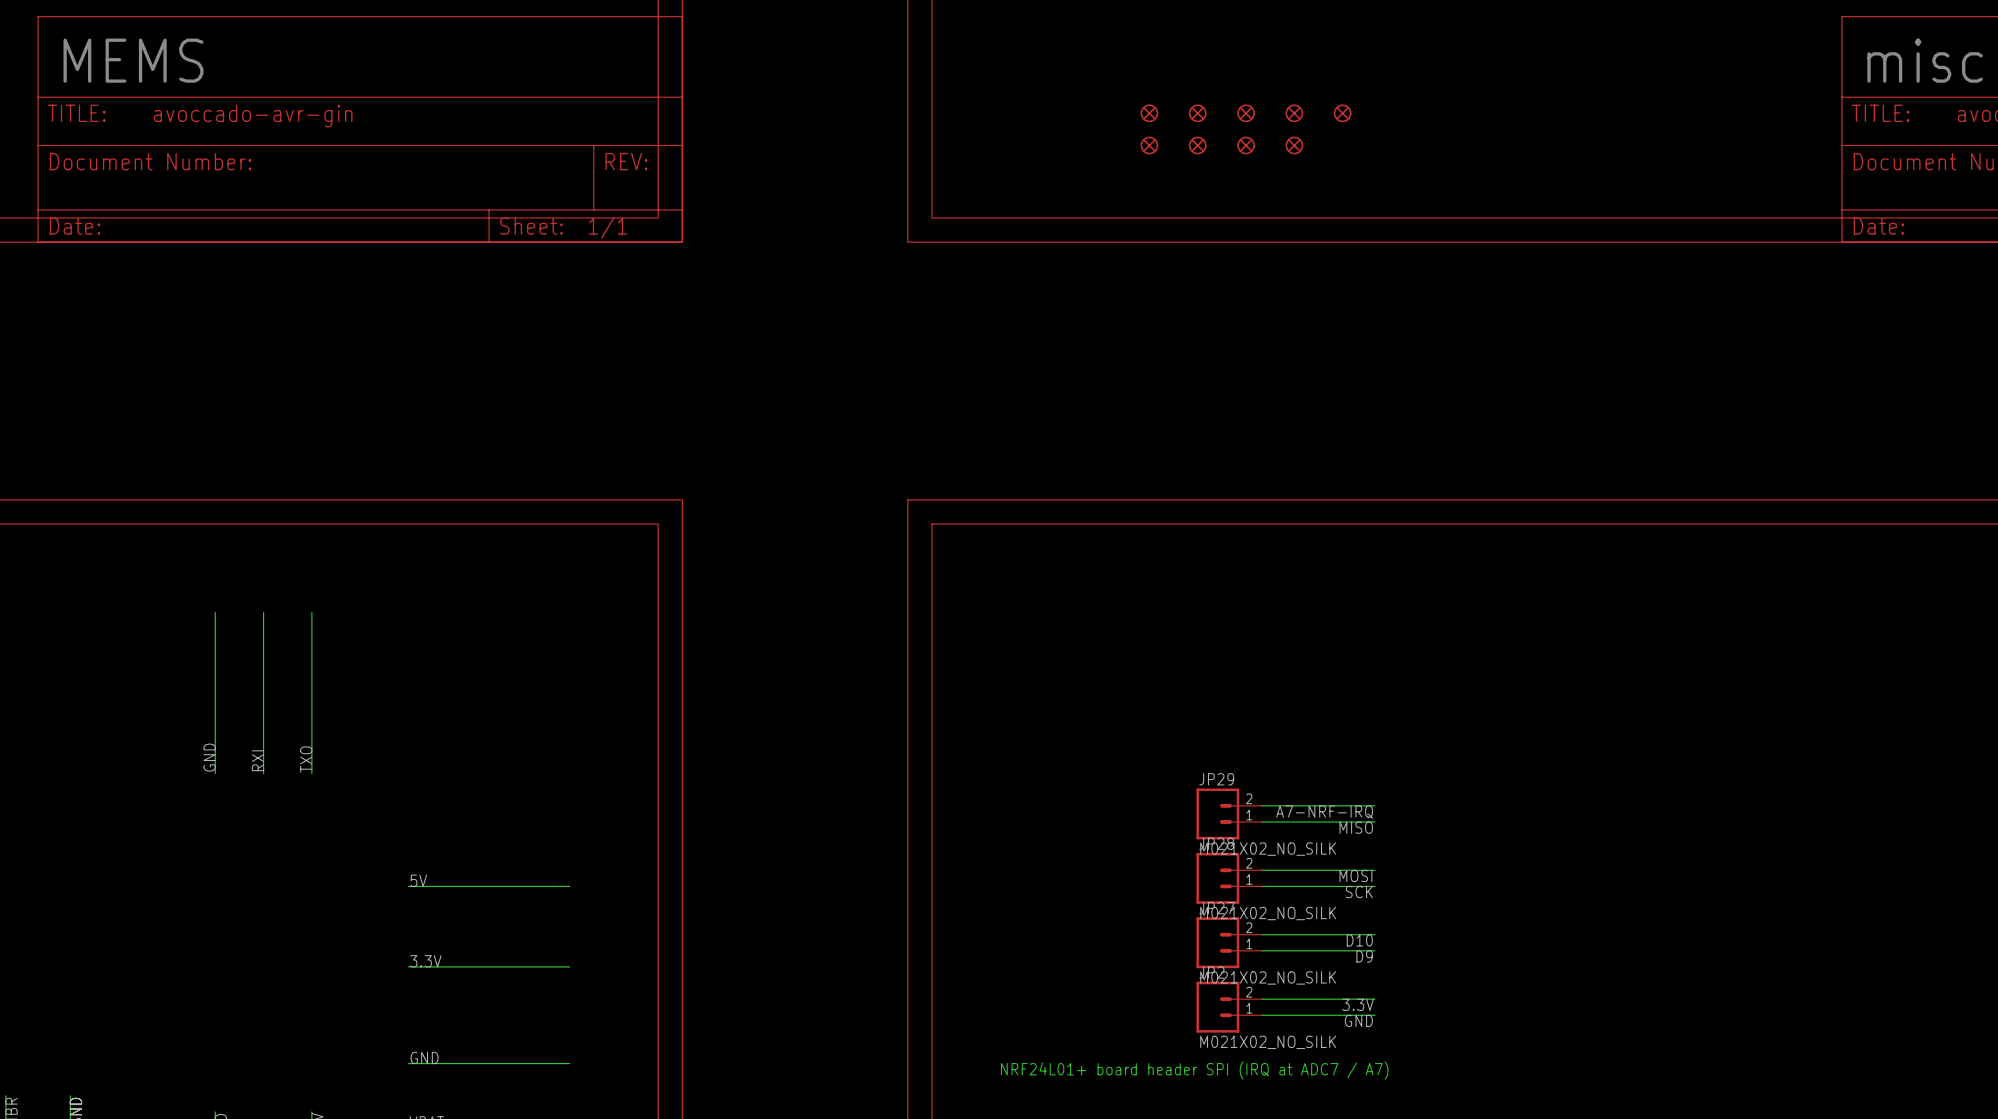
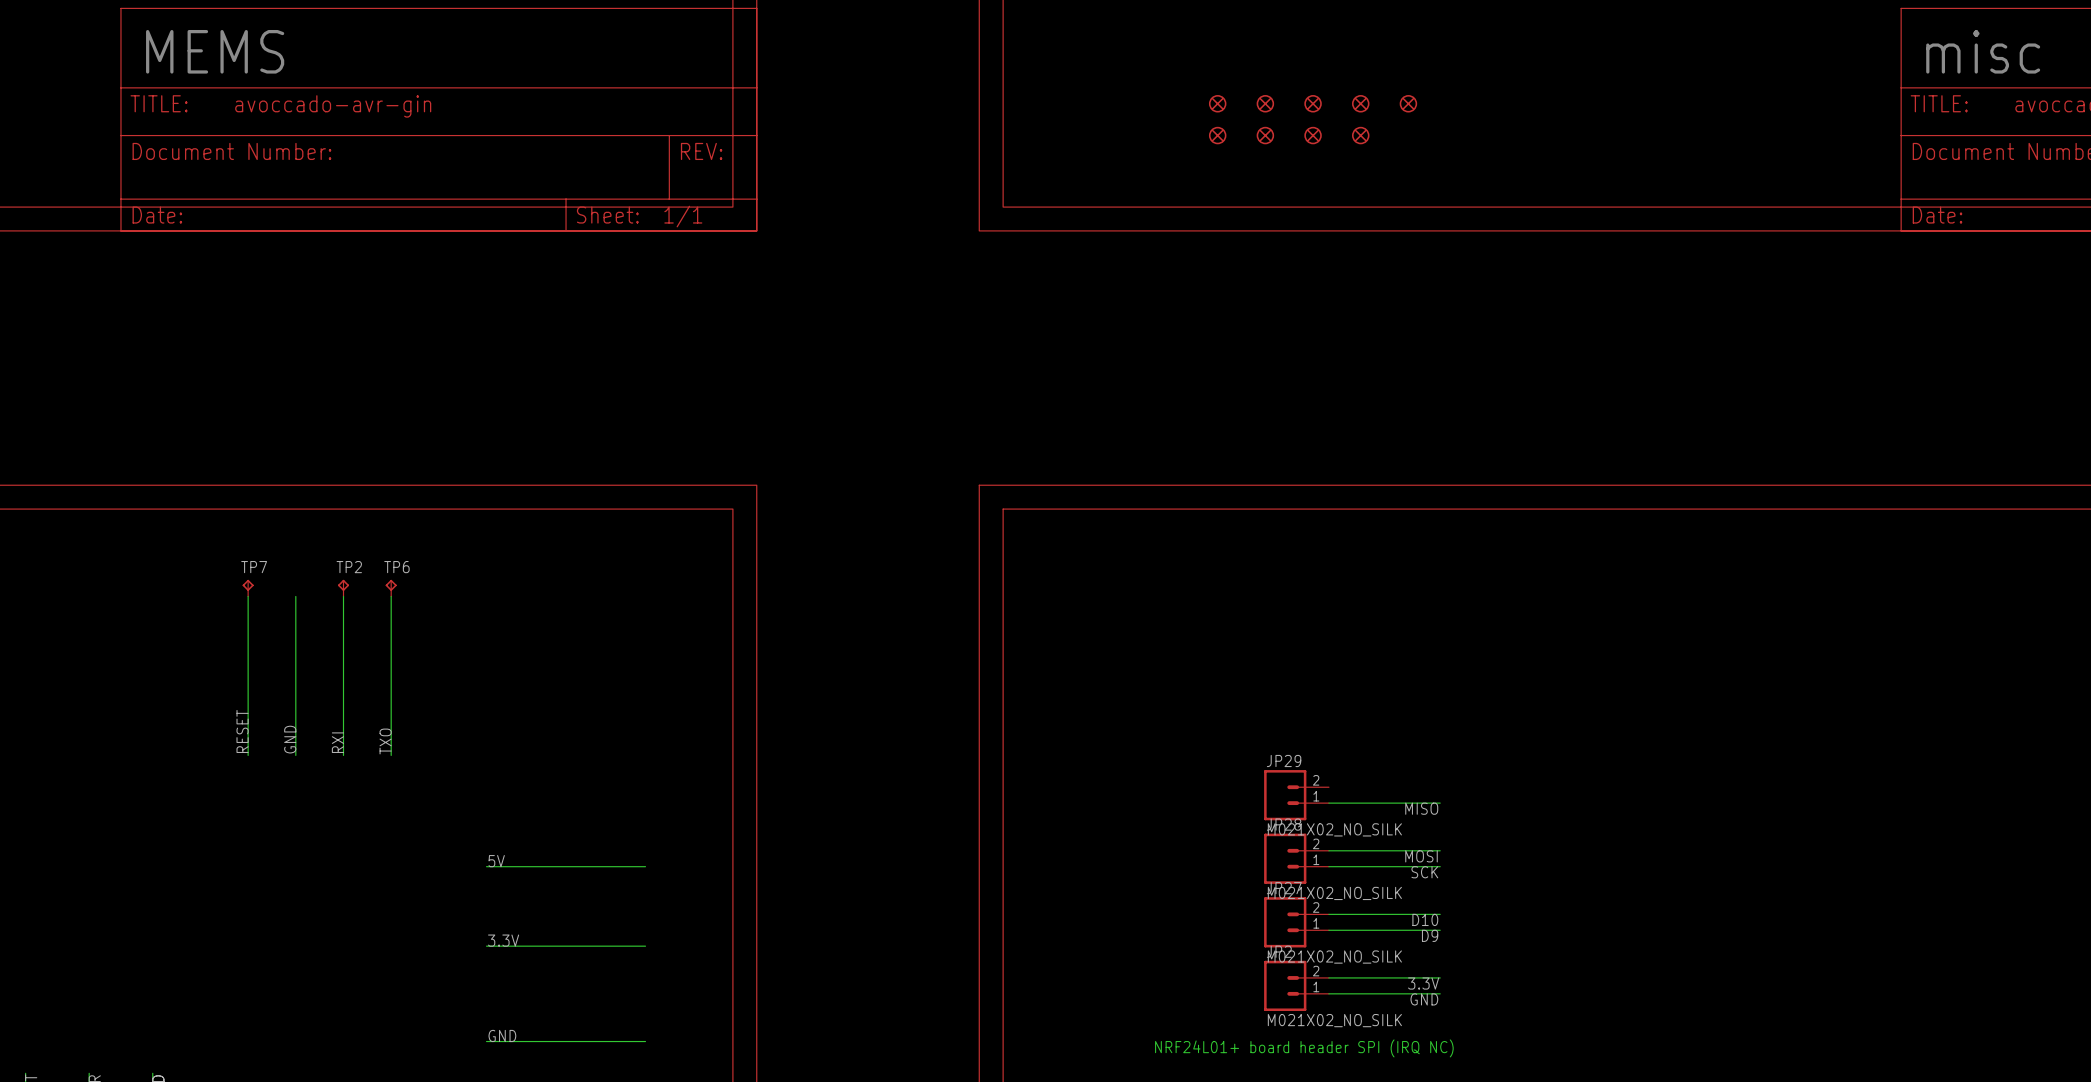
TP7: none -> (248, 588)
TP2: none -> (343, 588)
TP6: none -> (391, 588)
wire: none -> (248, 596) (248, 755)
label: none -> RESET (242, 731)
wire: (1262, 805) (1374, 805) -> none
label: A7-NRF-IRQ (1324, 812) -> none
text: NRF24L01+ board header SPI (IRQ at ADC7 / A7) (1194, 1070) -> NRF24L01+ board header SPI (IRQ NC) (1304, 1048)

